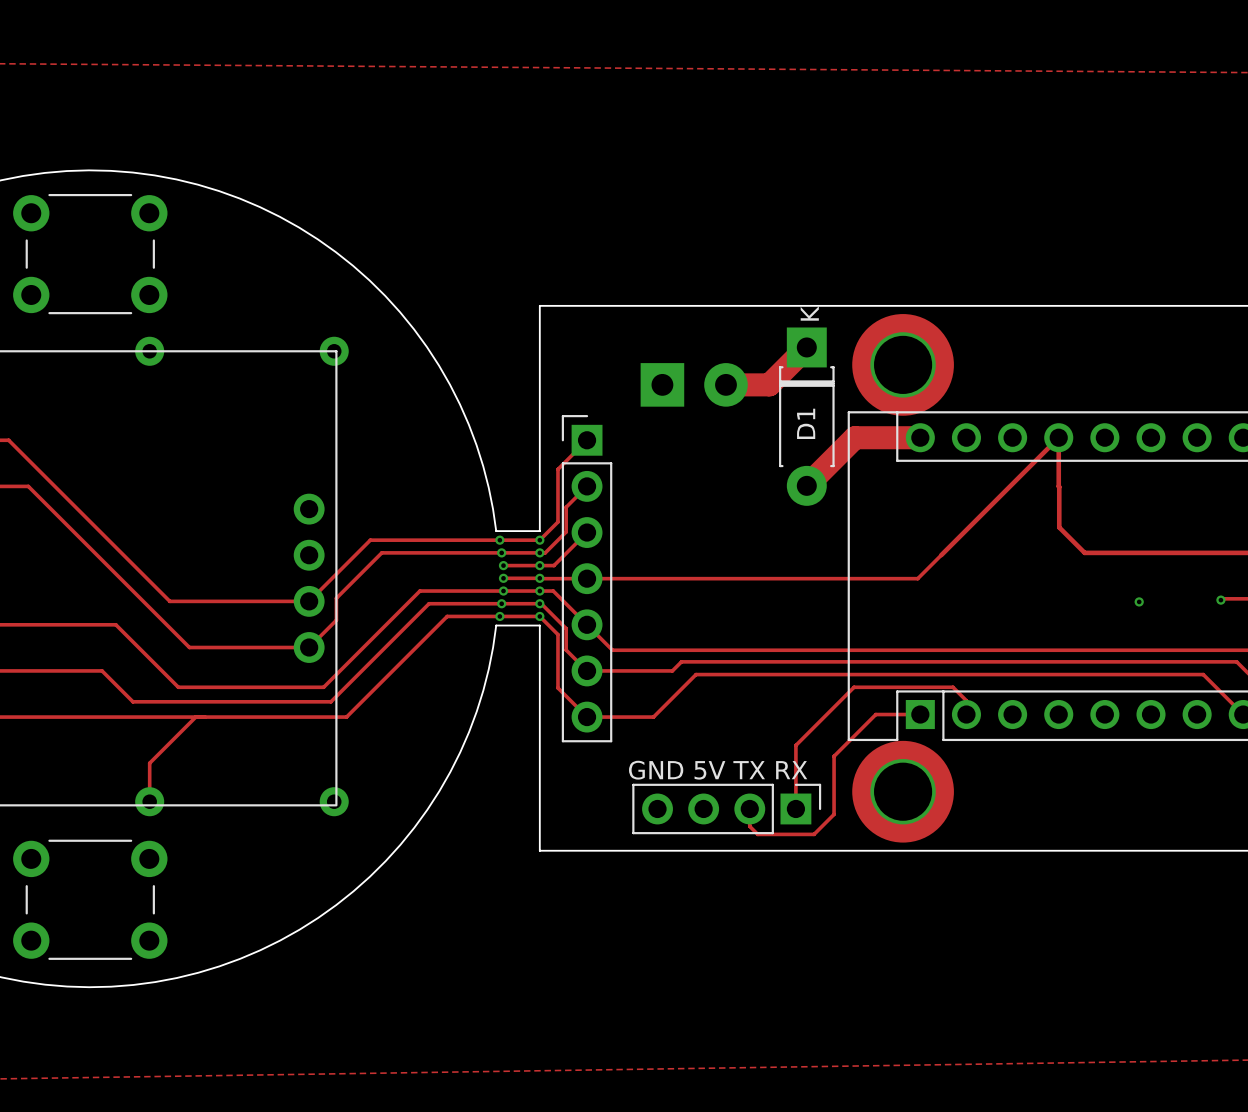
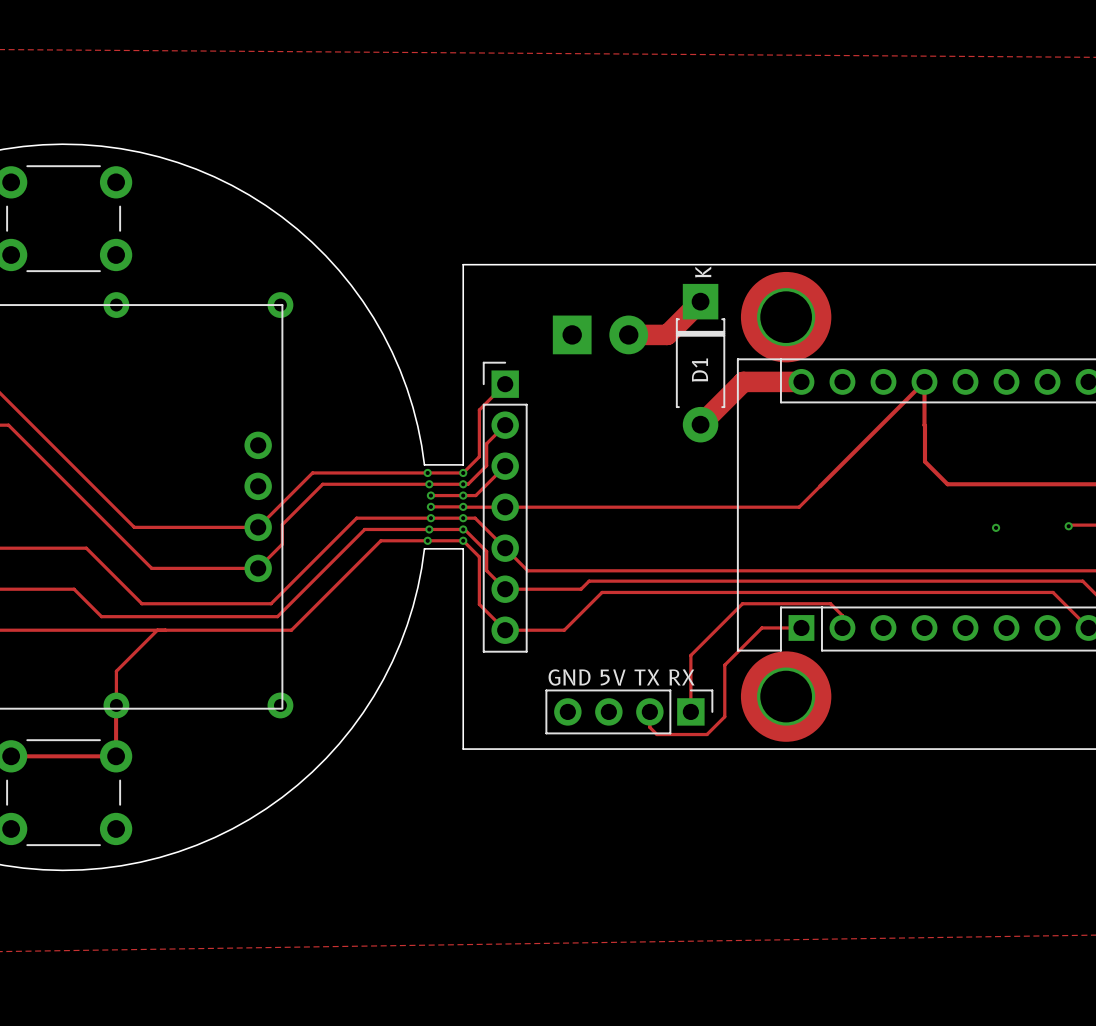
track: none -> (116, 705) (116, 756) (11, 756)

